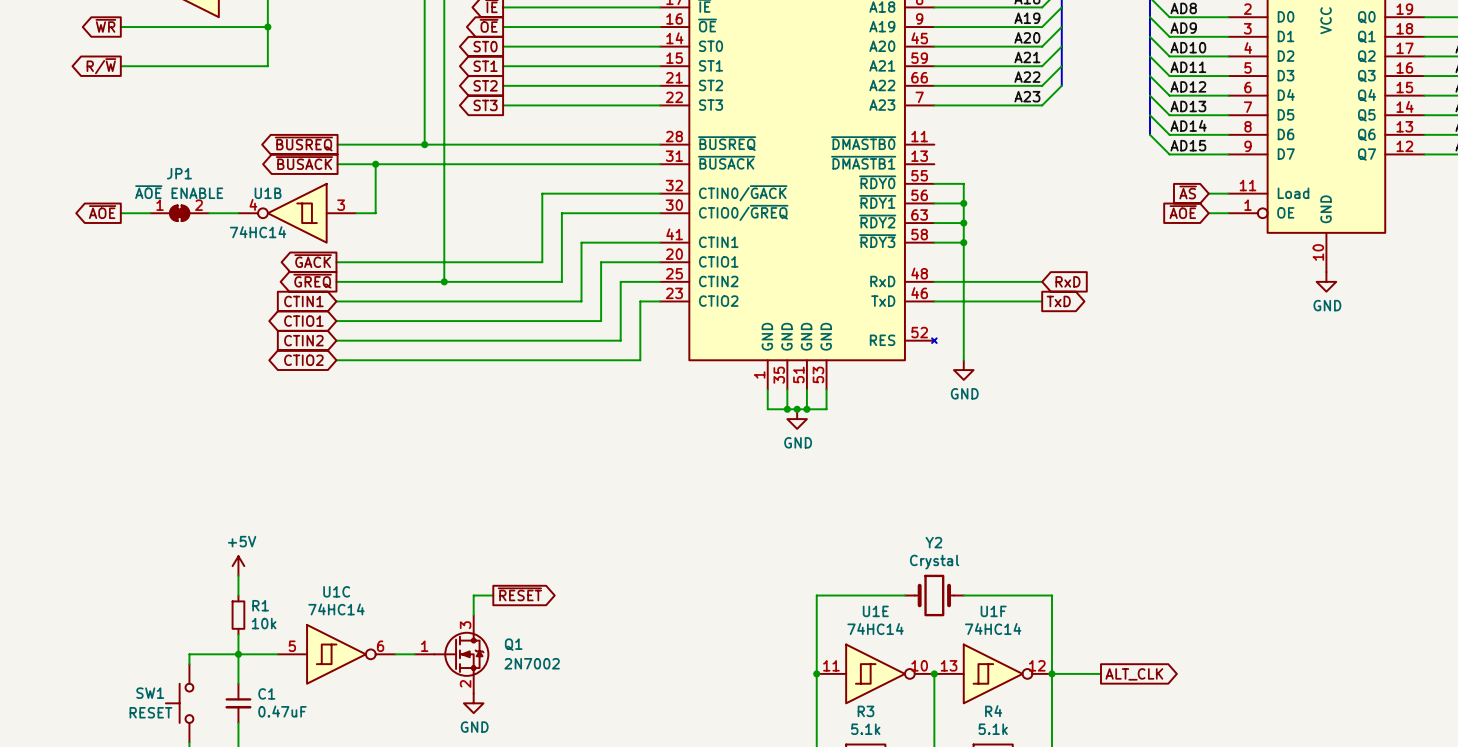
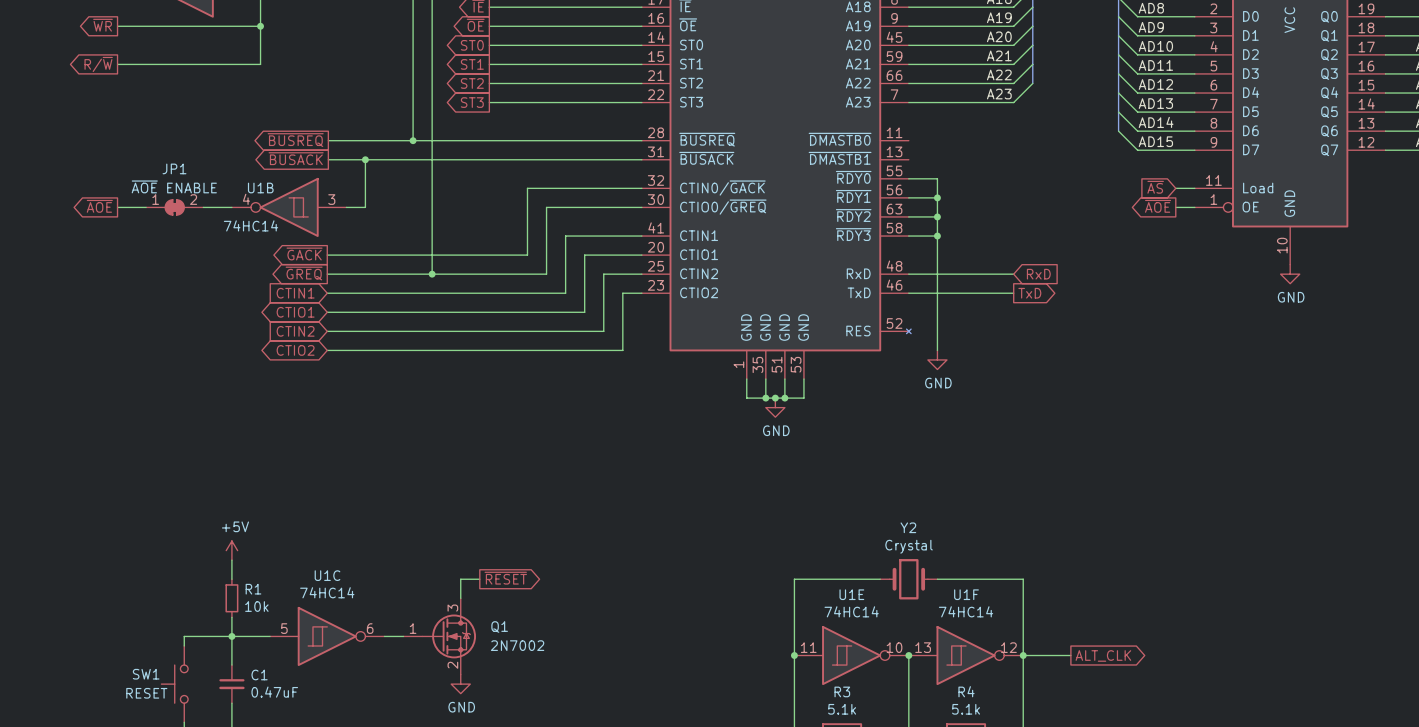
global label shape: input (1183, 212) -> output (1158, 206)

